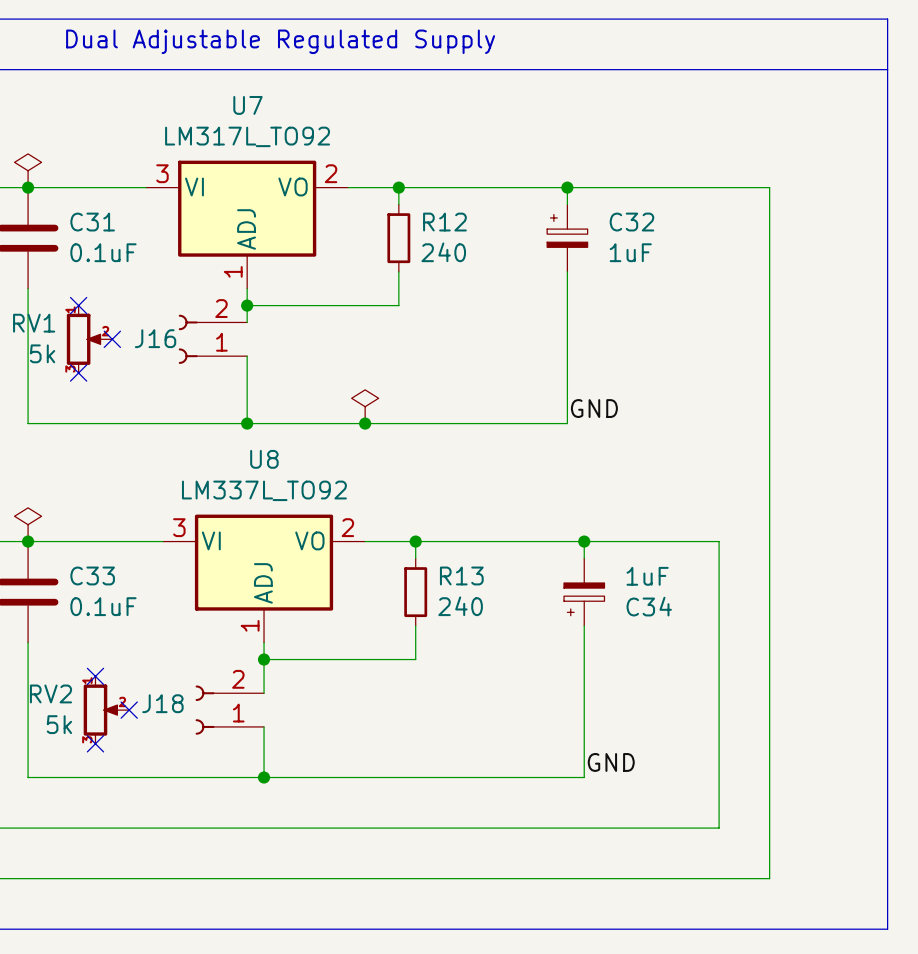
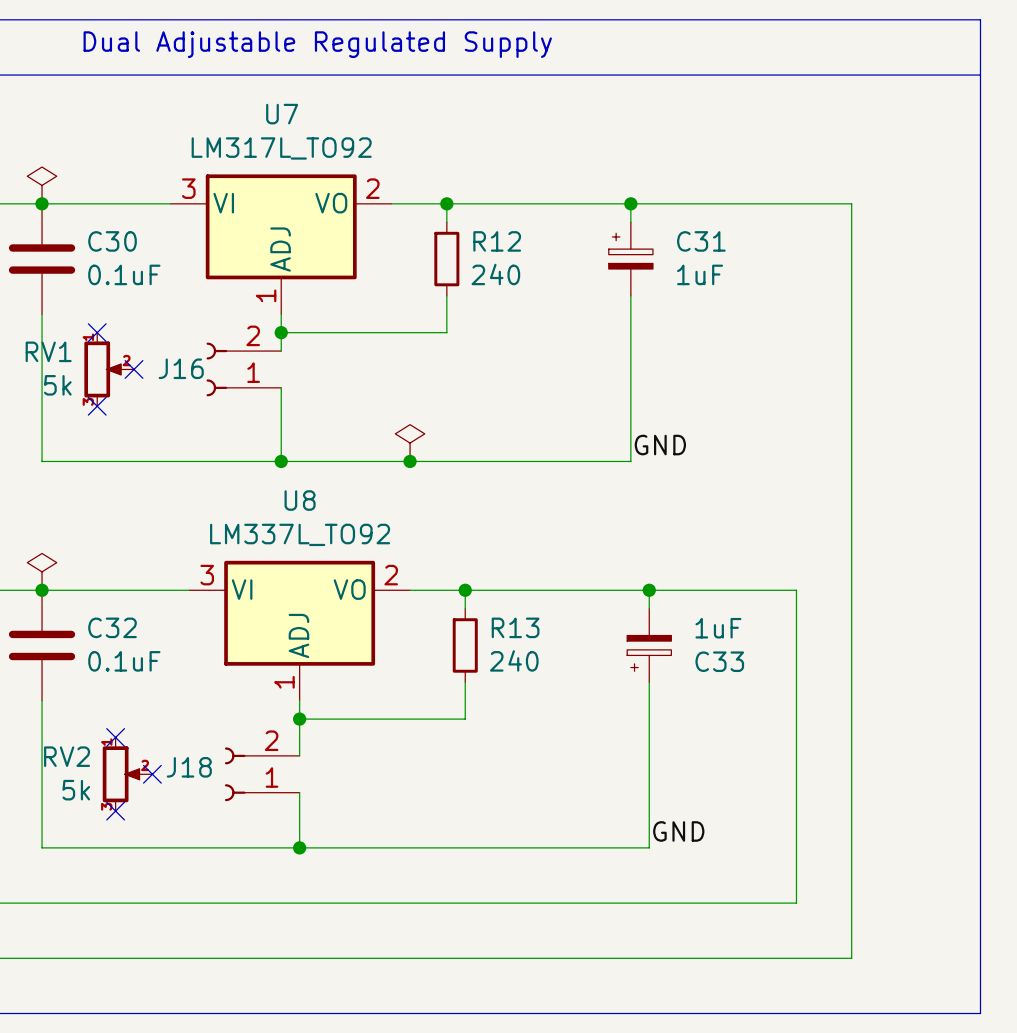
C31 name: C31 (92, 222) -> C30 (112, 241)
C32 name: C32 (631, 222) -> C31 (701, 241)
C33 name: C33 (92, 575) -> C32 (112, 627)
C34 name: C34 (649, 606) -> C33 (719, 661)

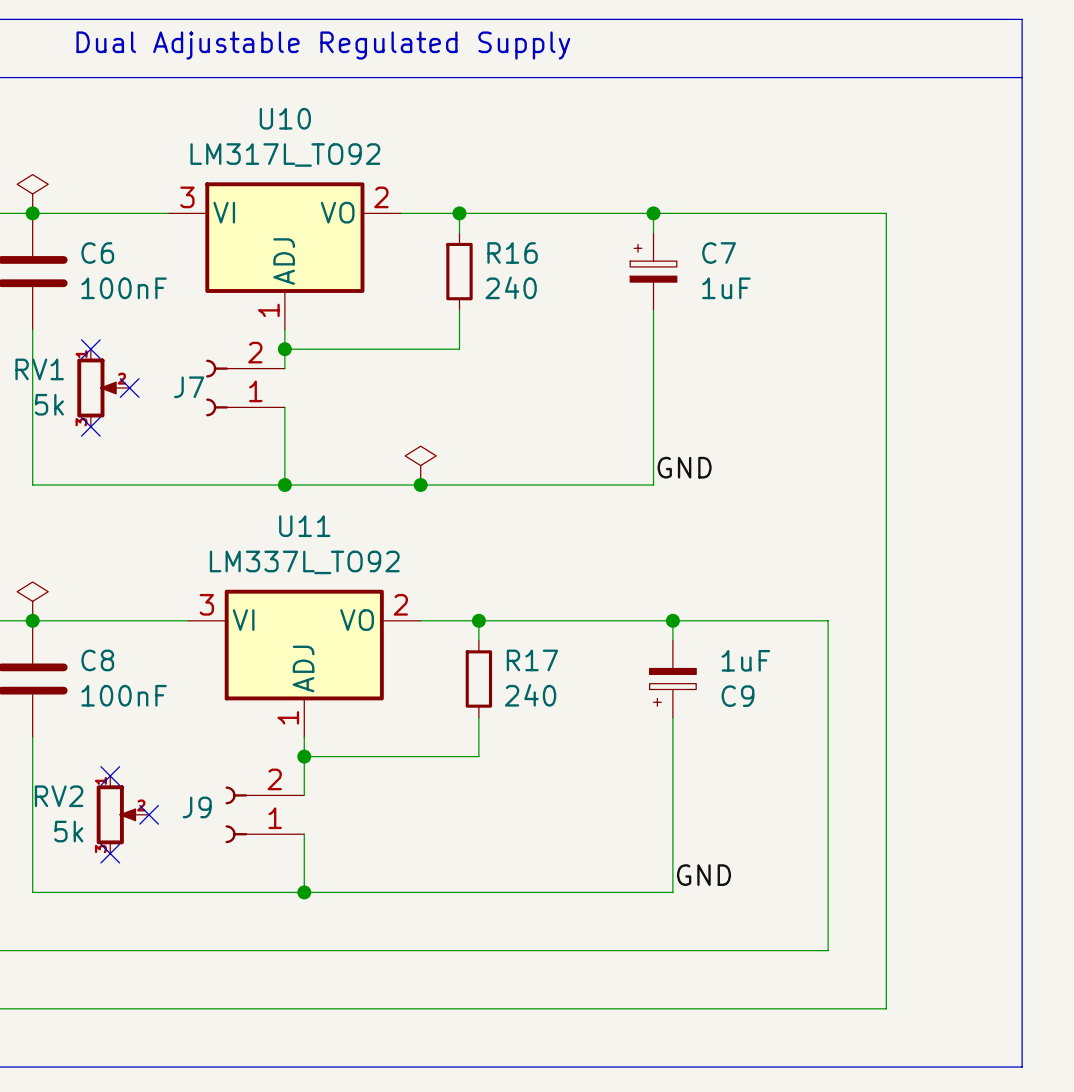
U7 name: U7 (282, 114) -> U10 (285, 118)
C30 name: C30 (112, 241) -> C6 (97, 253)
R12 name: R12 (497, 241) -> R16 (512, 253)
C31 name: C31 (701, 241) -> C7 (719, 253)
C30 value: 0.1uF (124, 274) -> 100nF (124, 288)
J16 name: J16 (181, 368) -> J7 (189, 387)
U8 name: U8 (300, 500) -> U11 (304, 526)
C32 name: C32 (112, 627) -> C8 (97, 660)
R13 name: R13 (515, 627) -> R17 (532, 660)
C32 value: 0.1uF (124, 661) -> 100nF (124, 695)
C33 name: C33 (719, 661) -> C9 (737, 696)
J18 name: J18 (189, 767) -> J9 (197, 807)

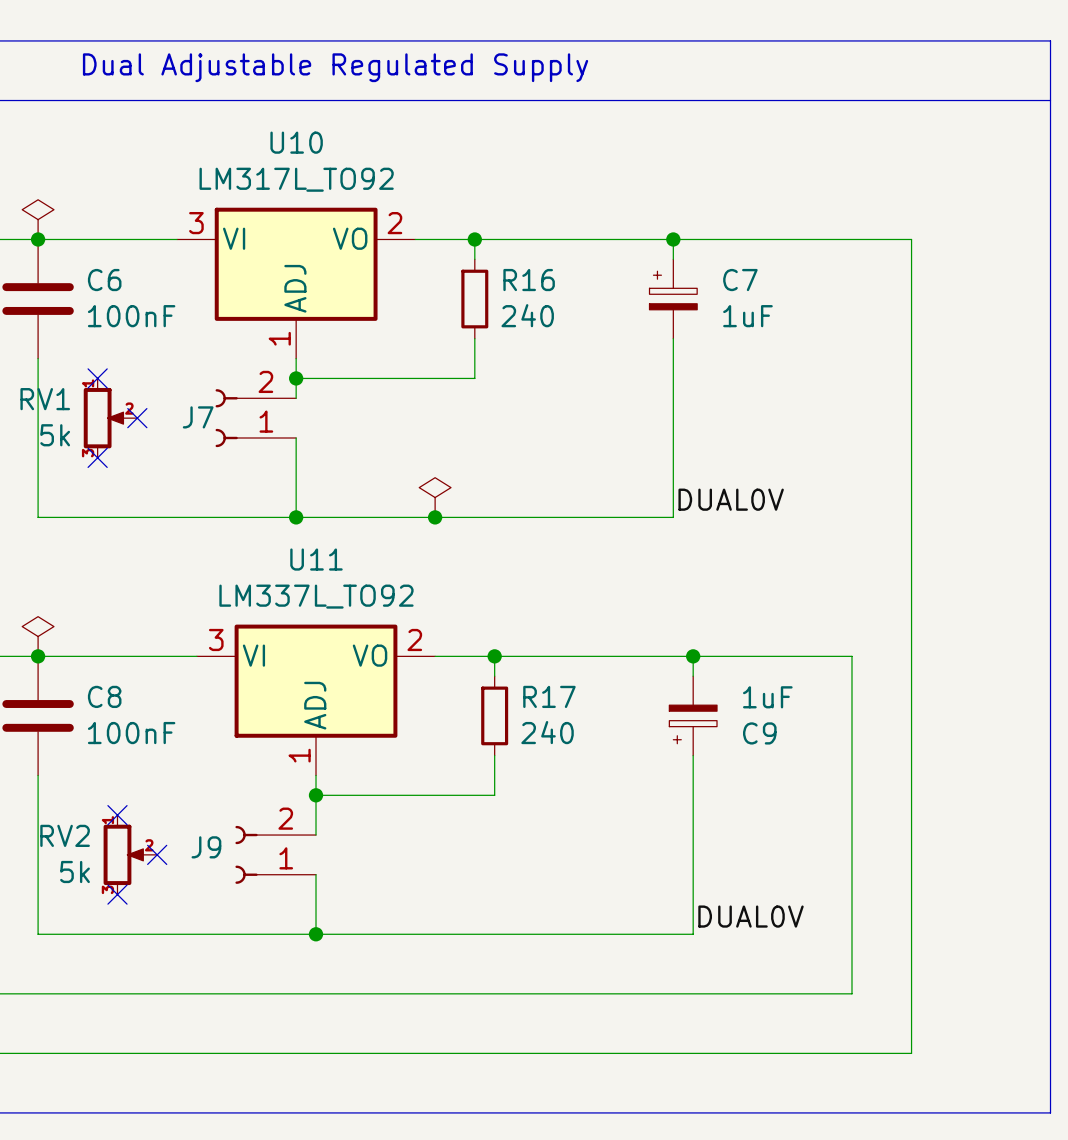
label: GND (684, 467) -> DUAL0V (731, 499)
label: GND (703, 875) -> DUAL0V (750, 916)

